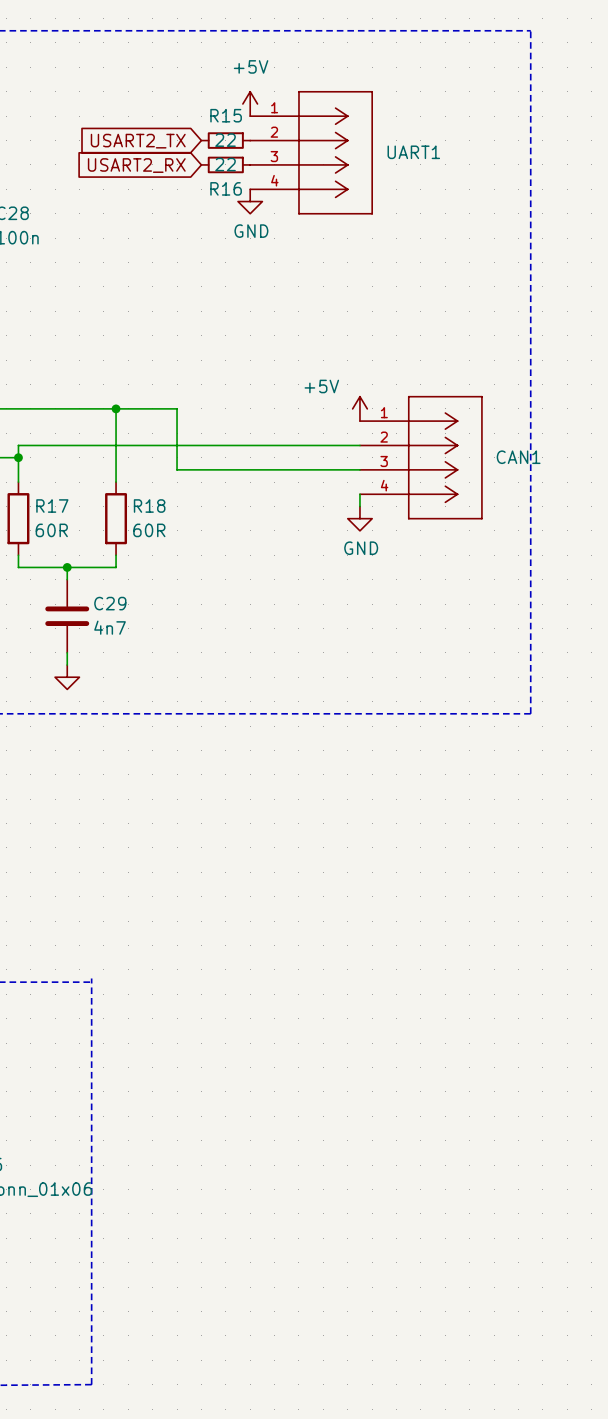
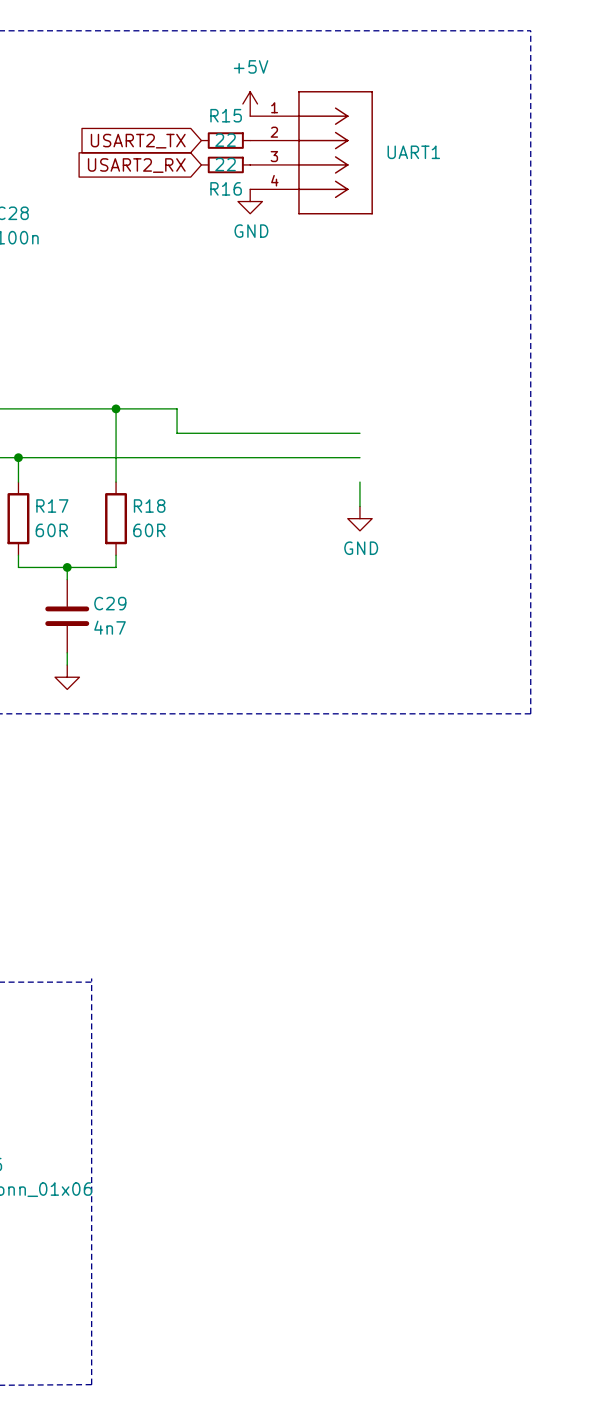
power symbol: +5V (359, 408) -> none
wire: (177, 433) (177, 469) (359, 469) -> (177, 433) (359, 433)
wire: (359, 445) (18, 445) (18, 457) -> (359, 457) (18, 457)
CAN1: (421, 457) -> none
wire: none -> (359, 482) (359, 494)

